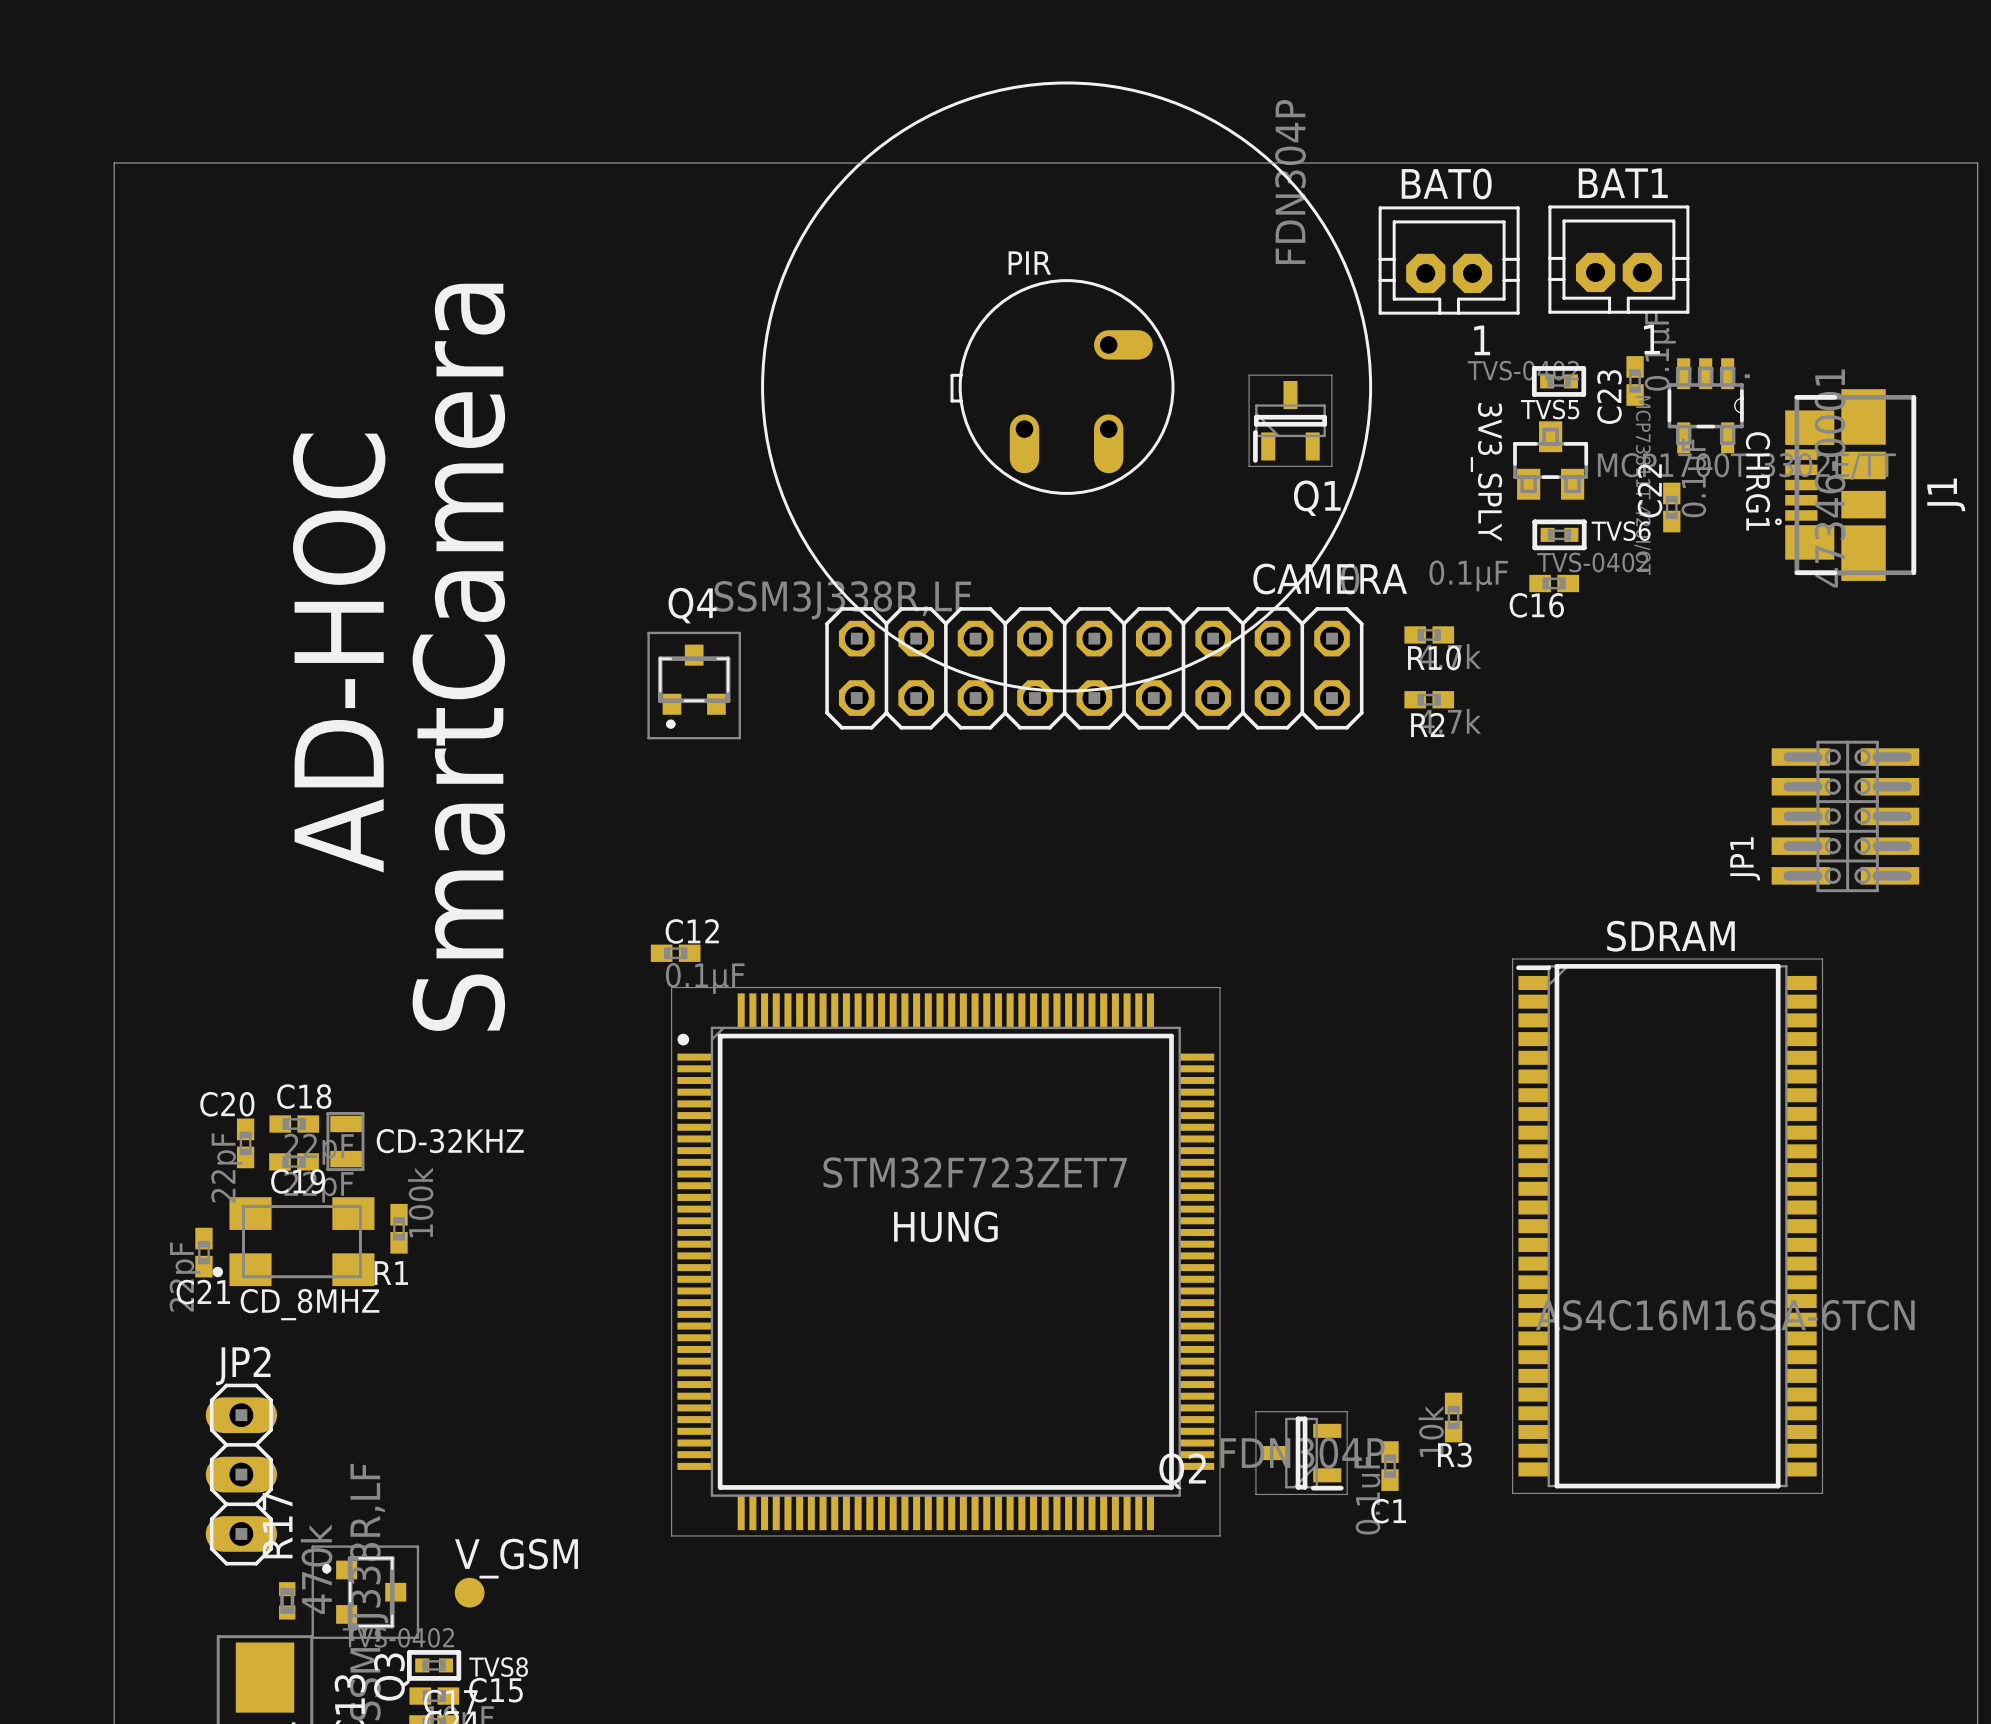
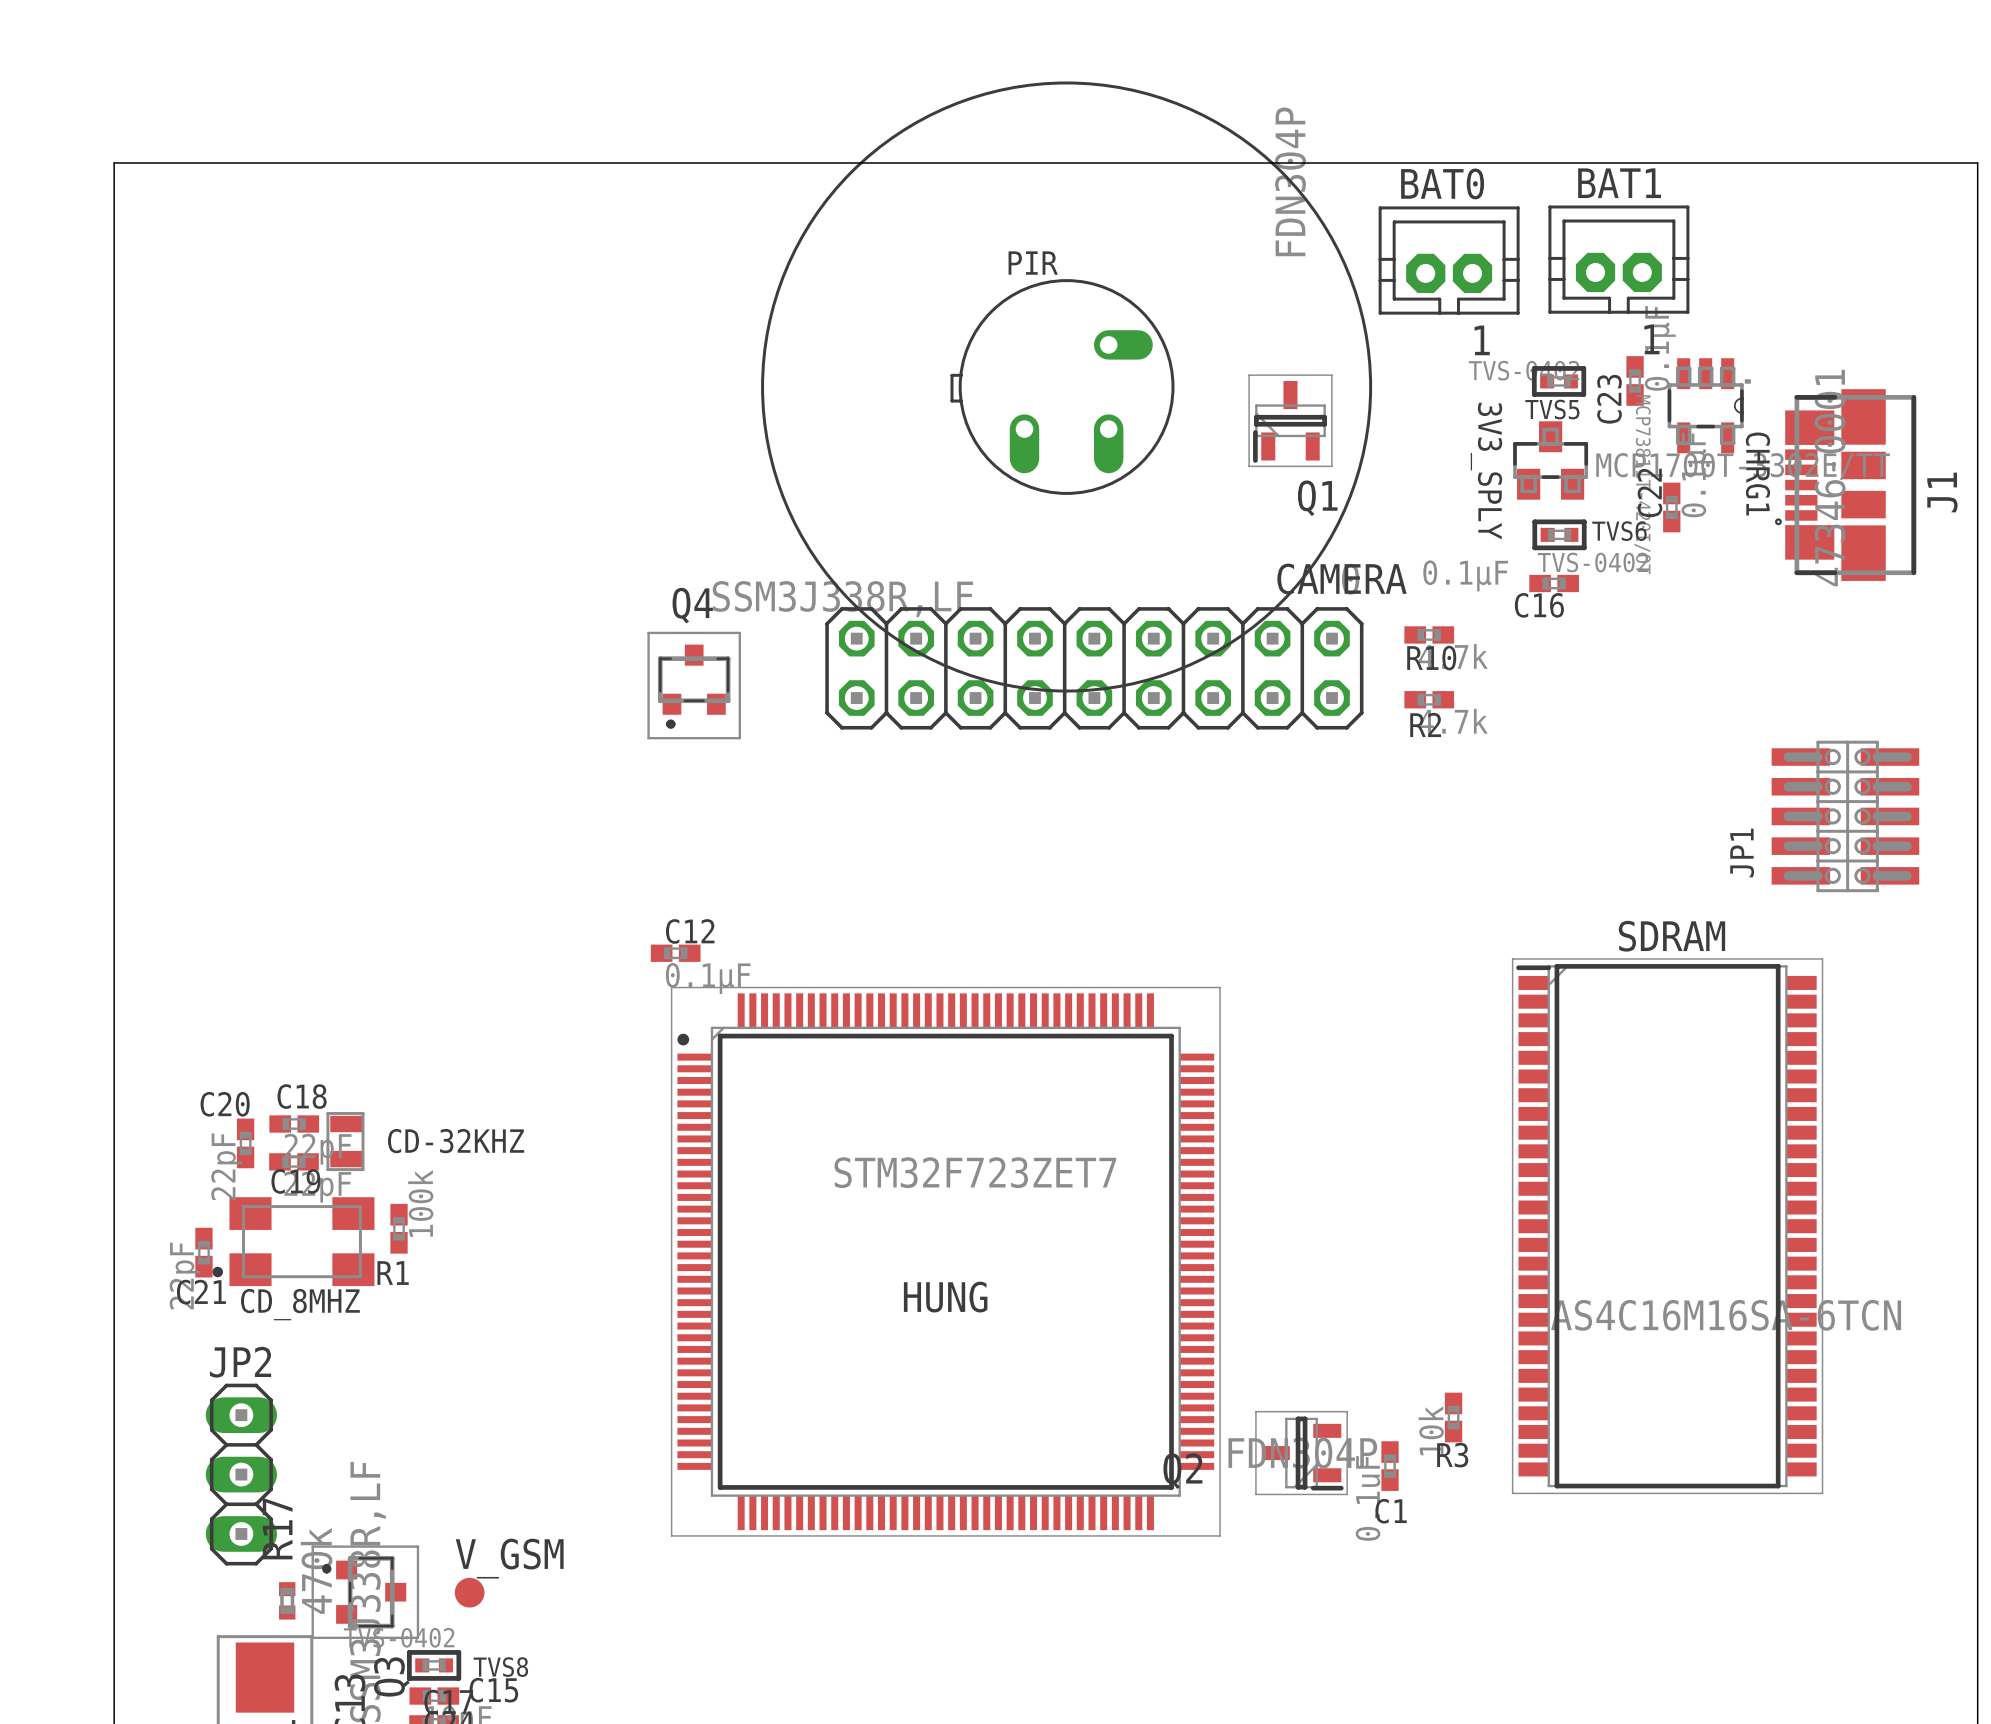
text: AD-HOC (339, 653) -> none
text: SmartCamera (458, 657) -> none
HUNG name position: HUNG (945, 1226) -> HUNG (945, 1297)

